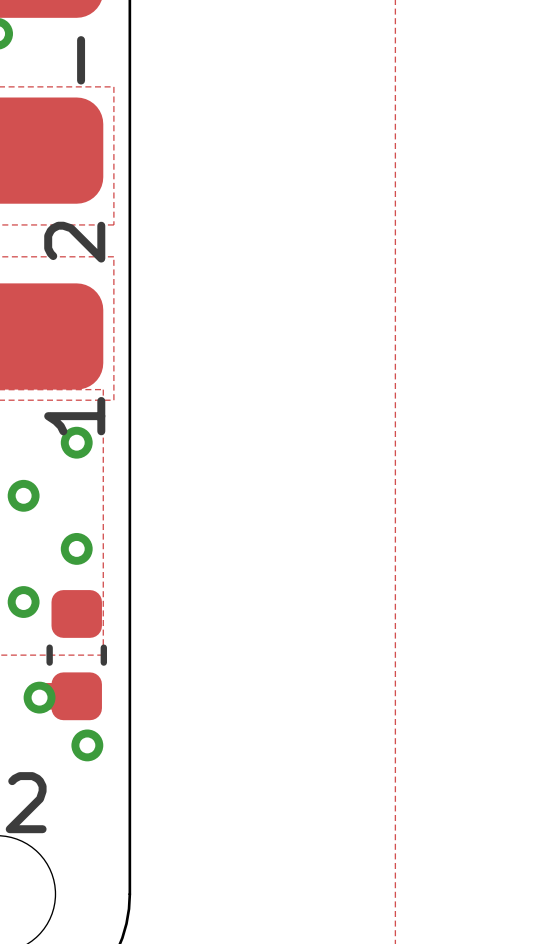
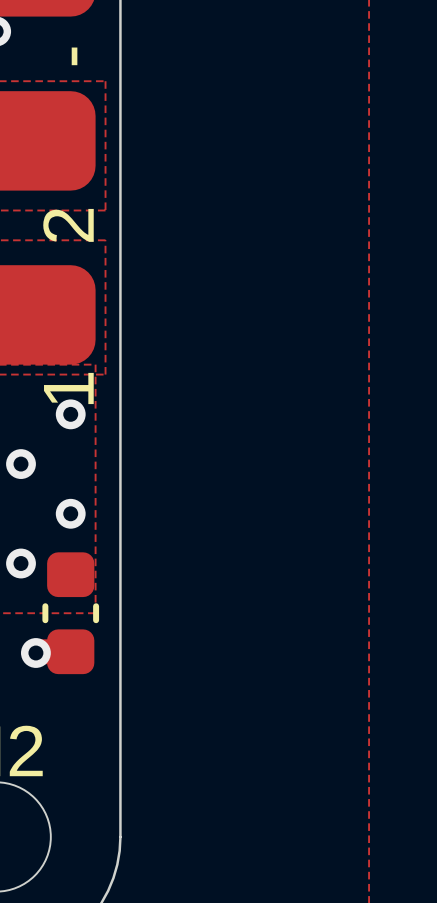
via: (87, 745) -> none

